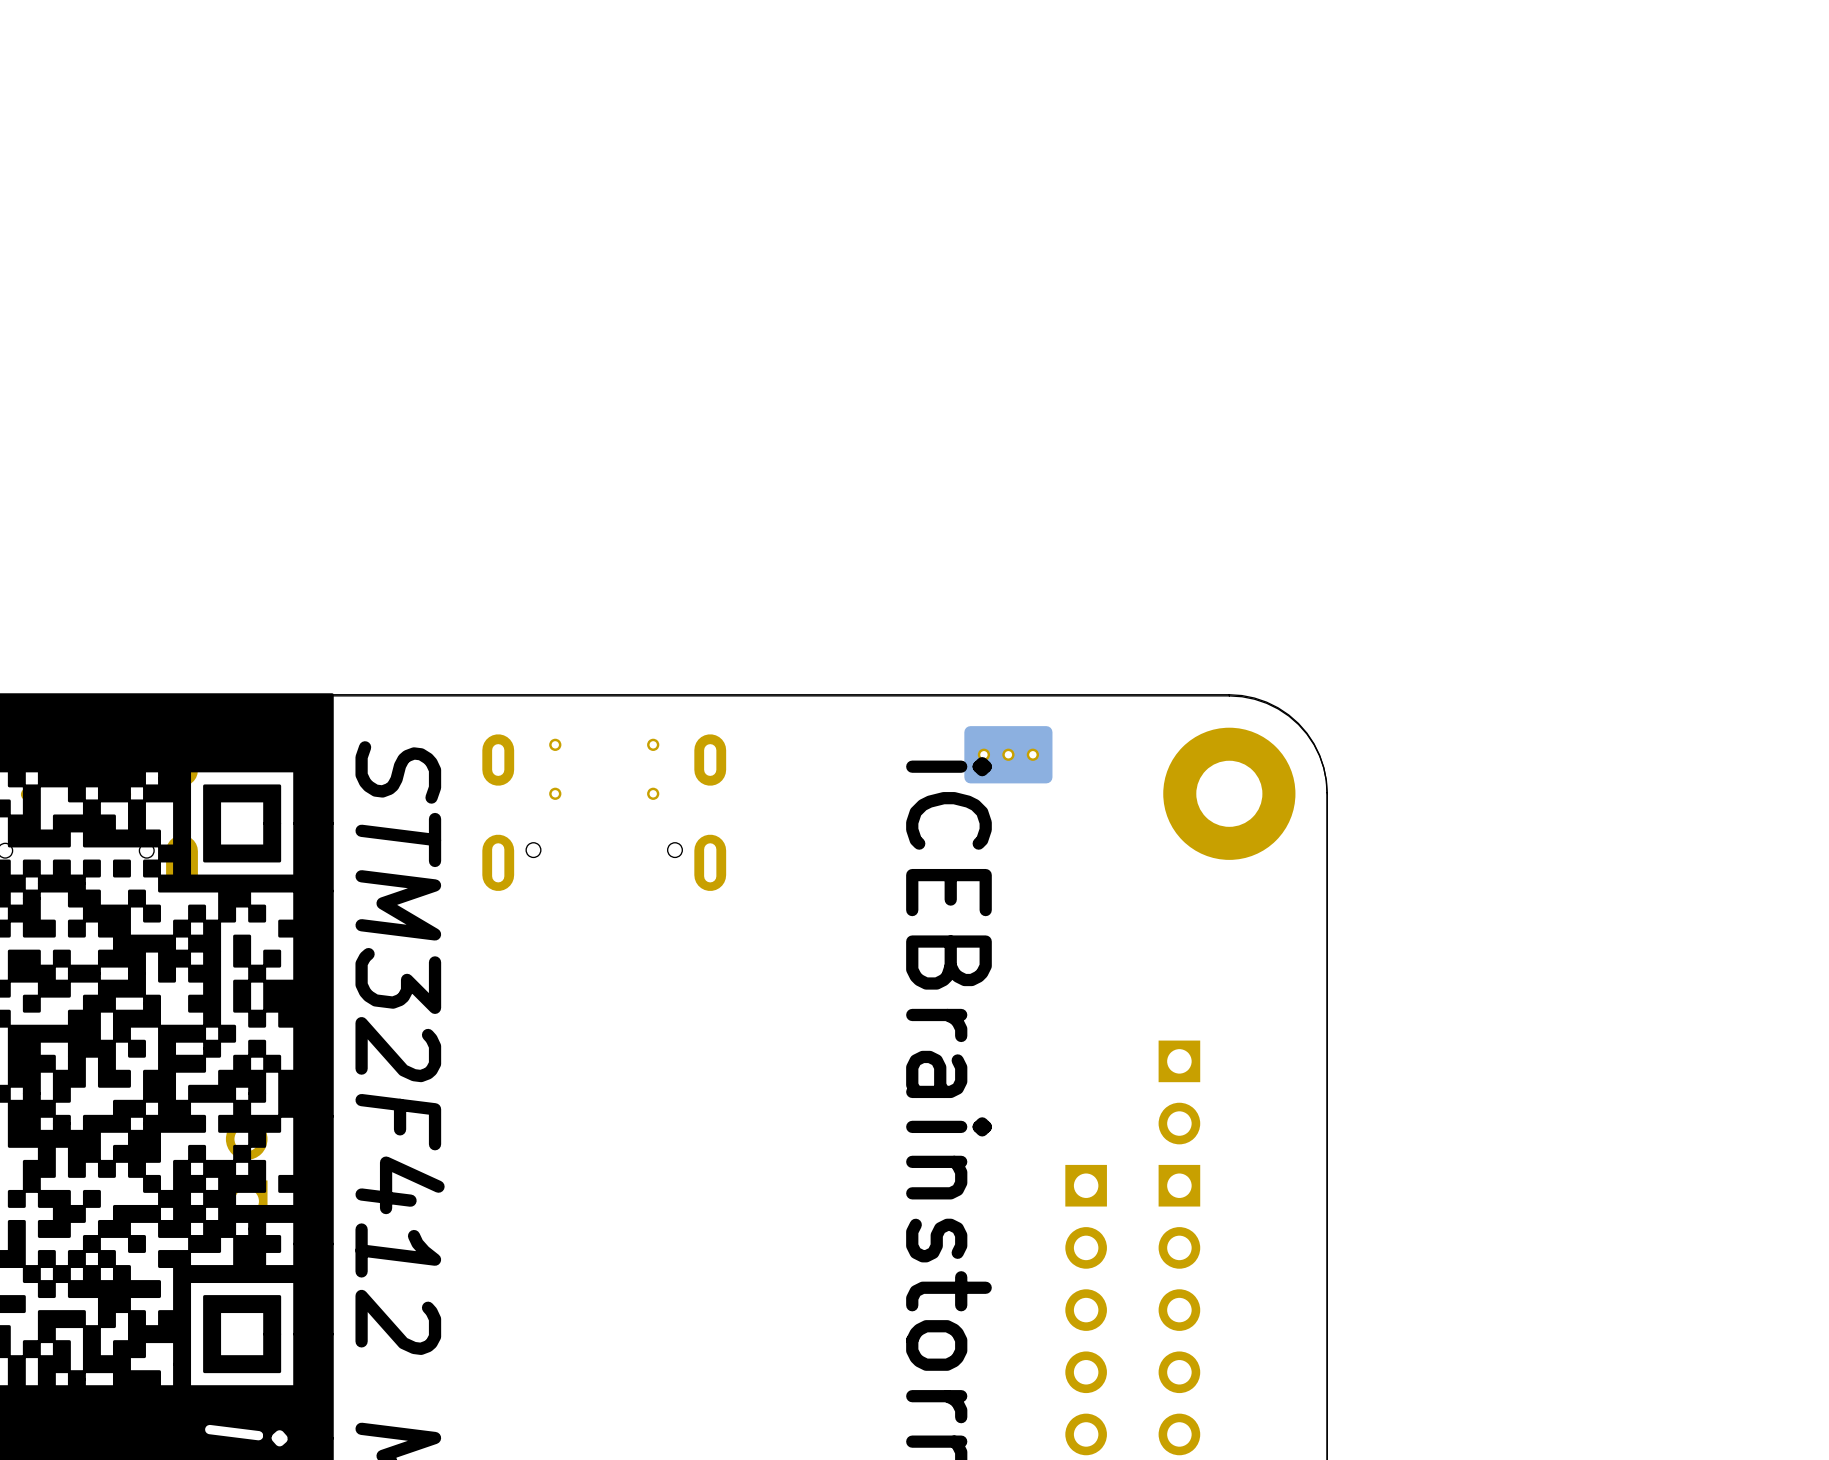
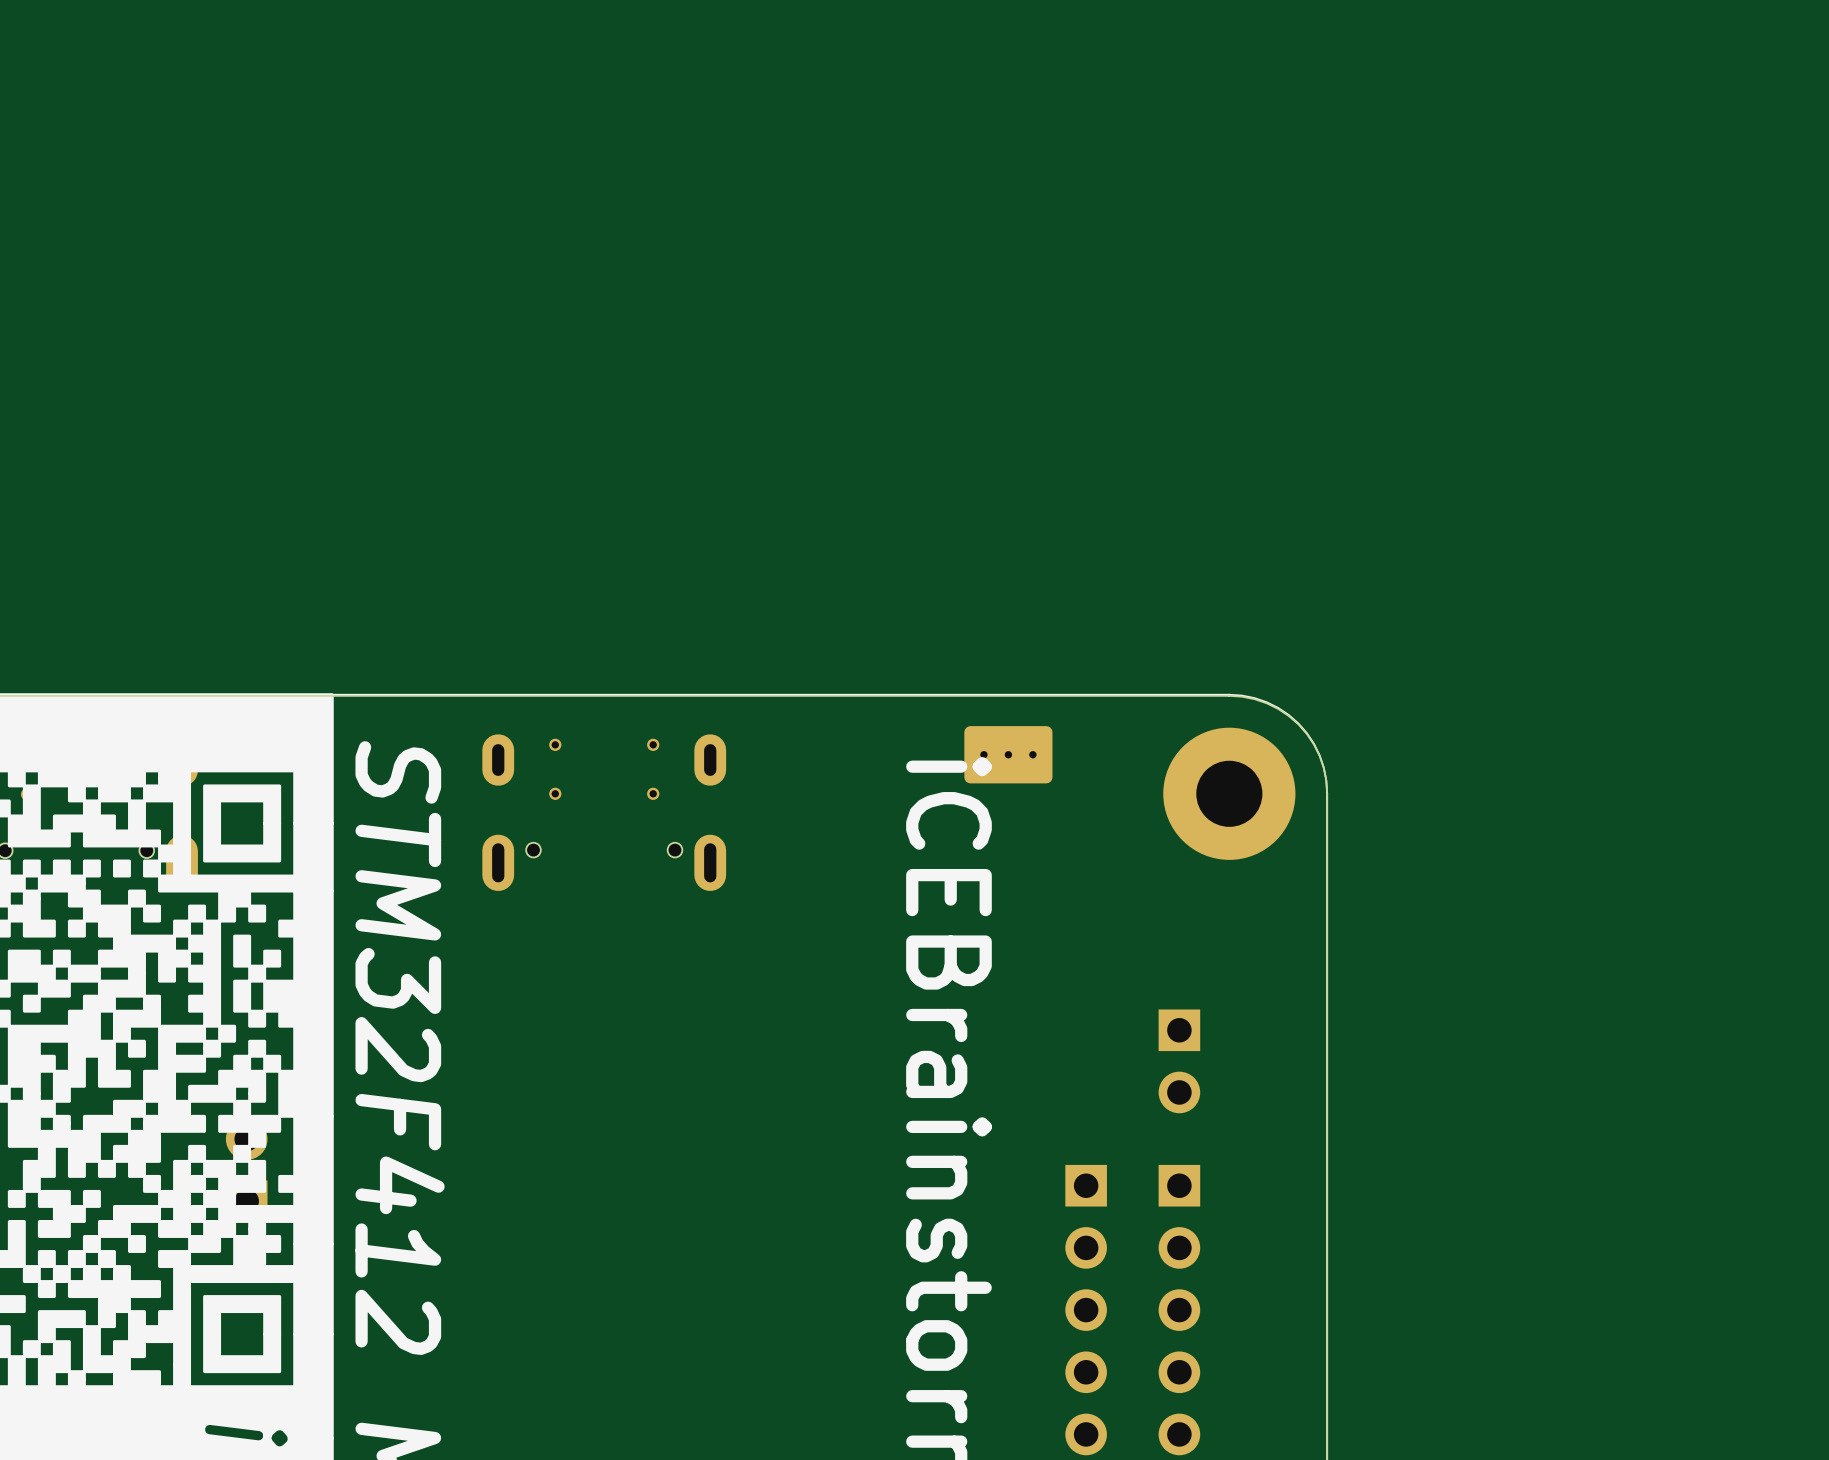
part position: (1179, 1092) -> (1179, 1061)

